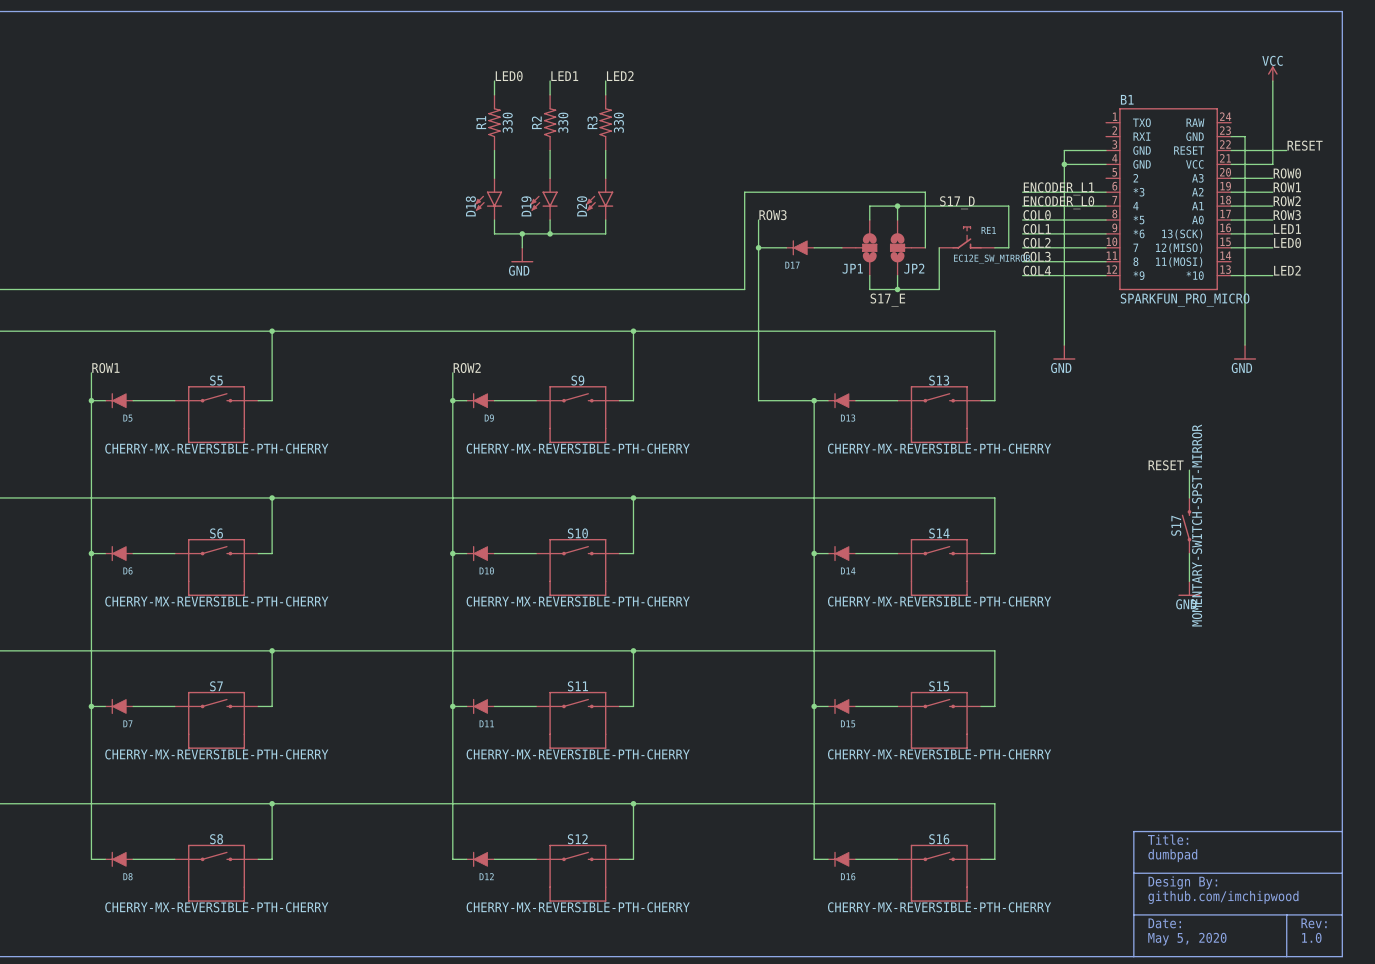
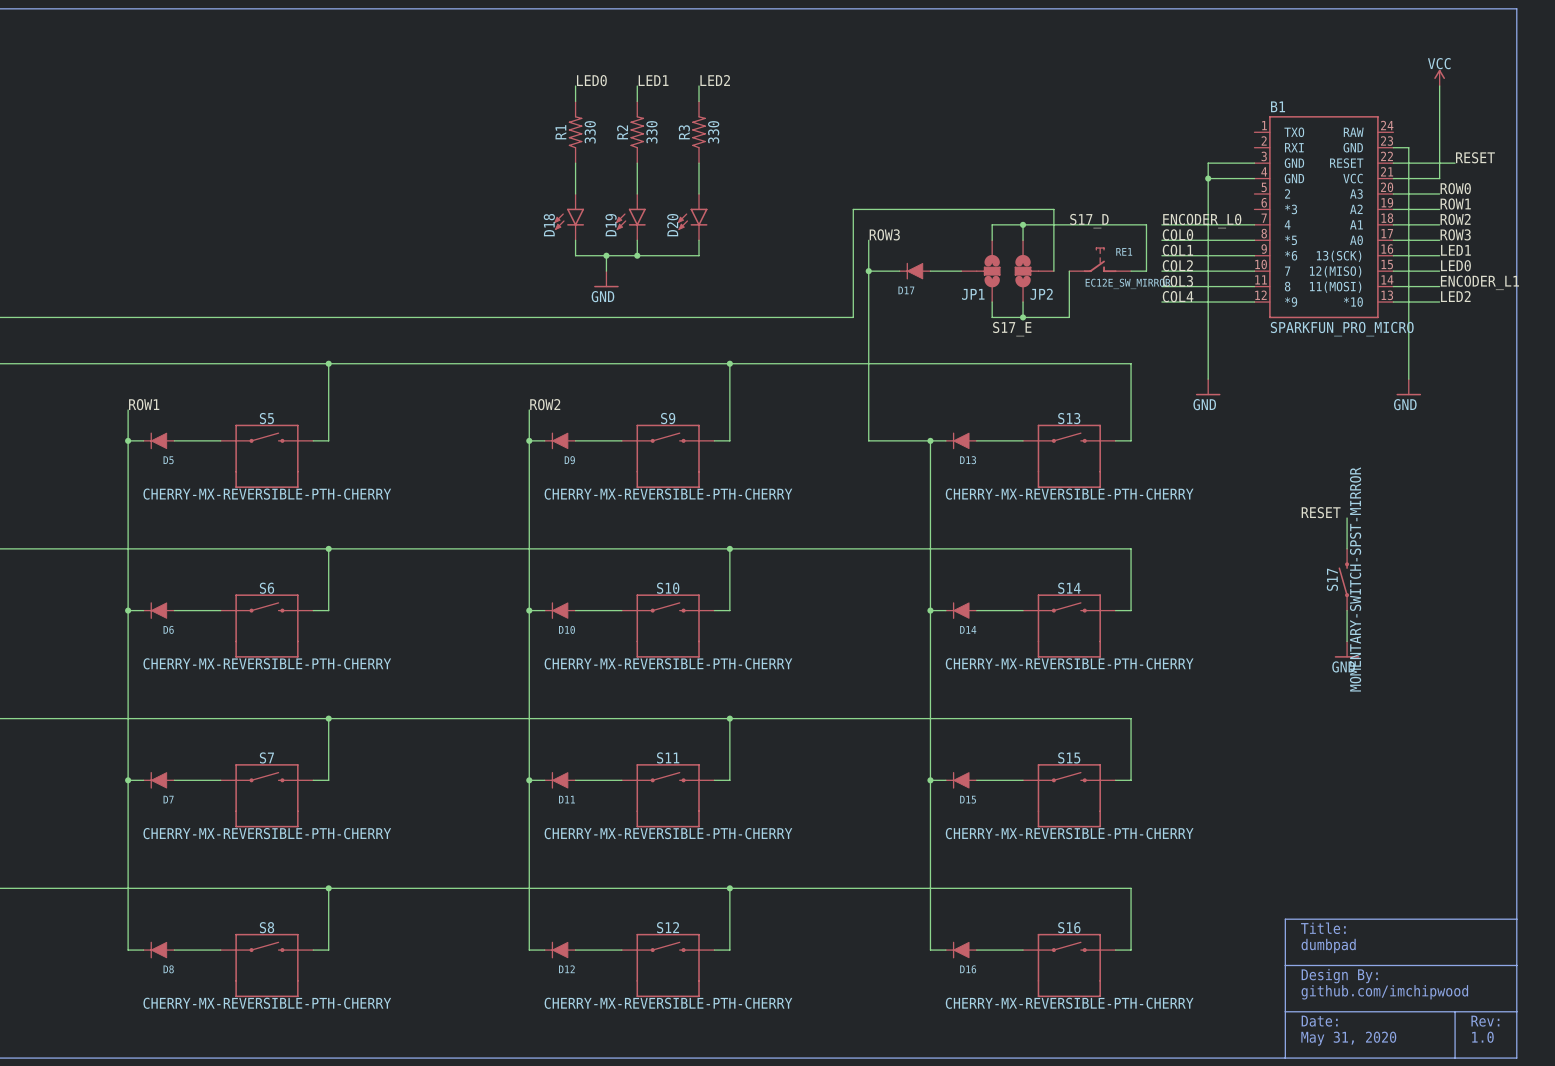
label: ENCODER_L1 (1058, 188) -> none
wire: (1022, 192) (1106, 192) -> none
label: none -> ENCODER_L1 (1479, 282)
wire: none -> (1393, 286) (1439, 286)
text: May 5, 2020 (1187, 939) -> May 31, 2020 (1348, 1038)

